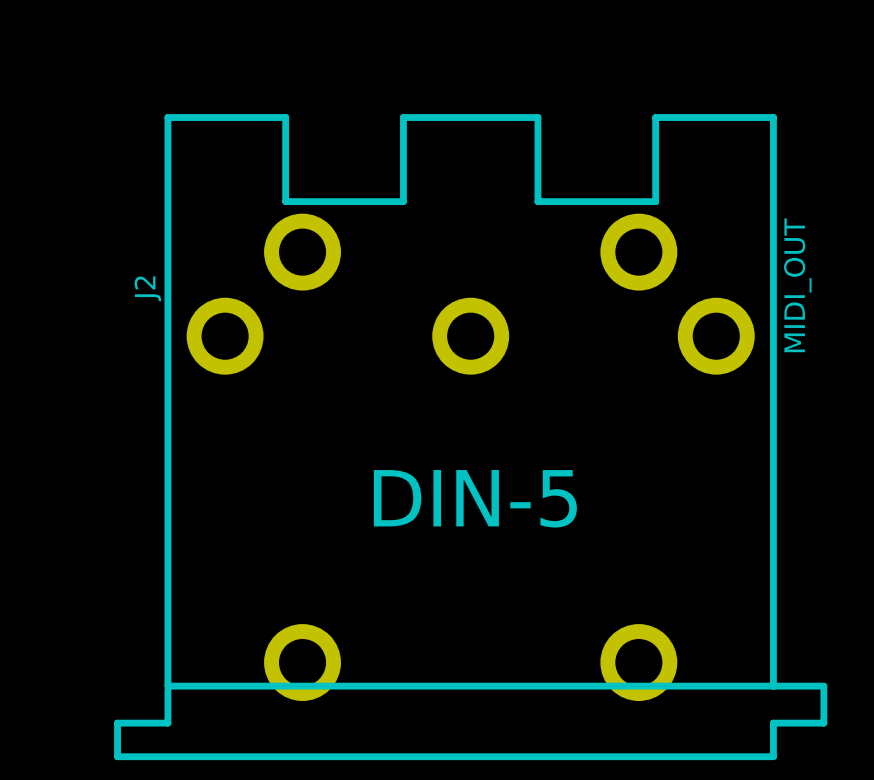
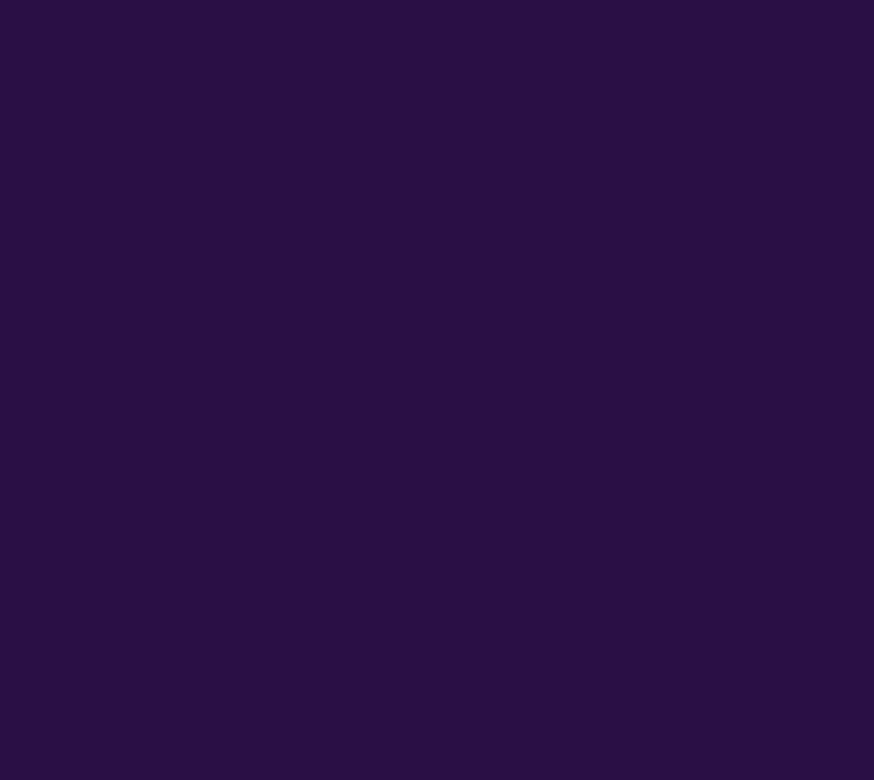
J2: MIDI_OUT (470, 437) -> none

